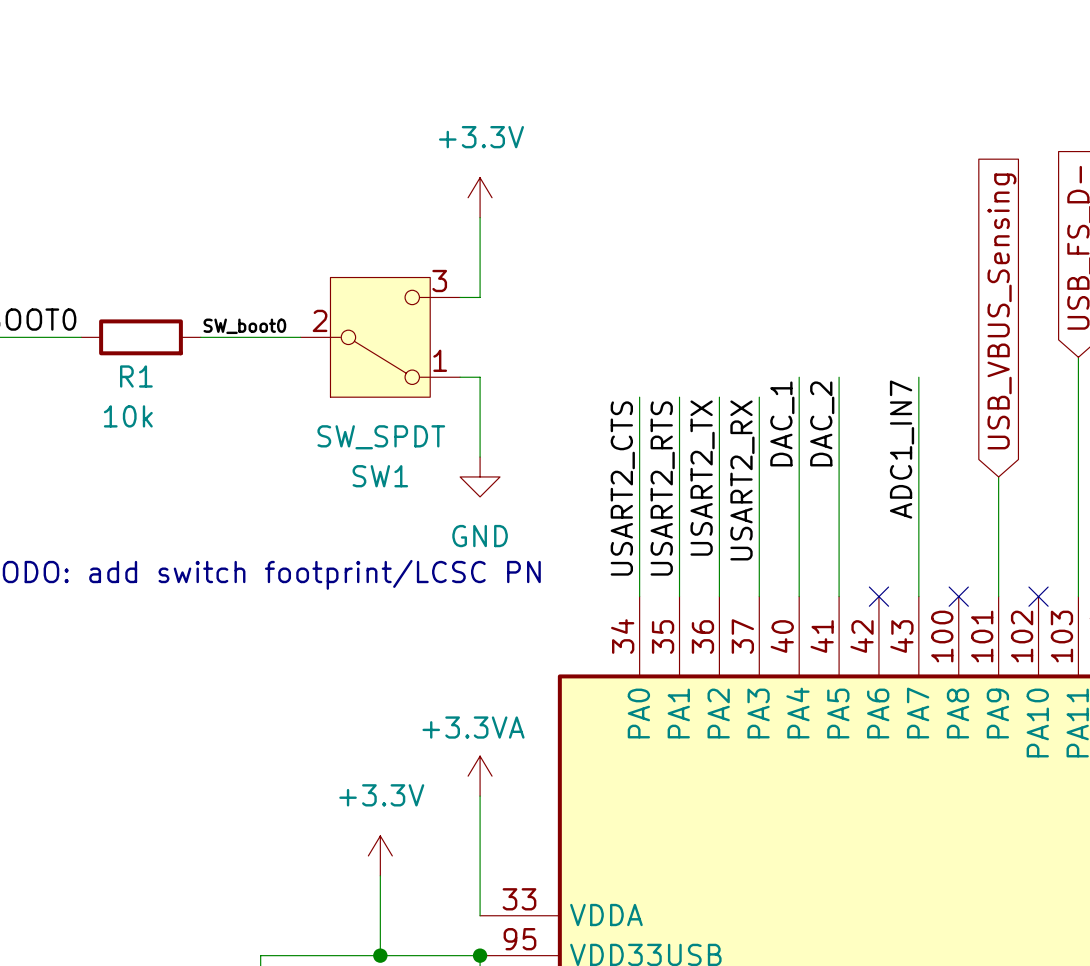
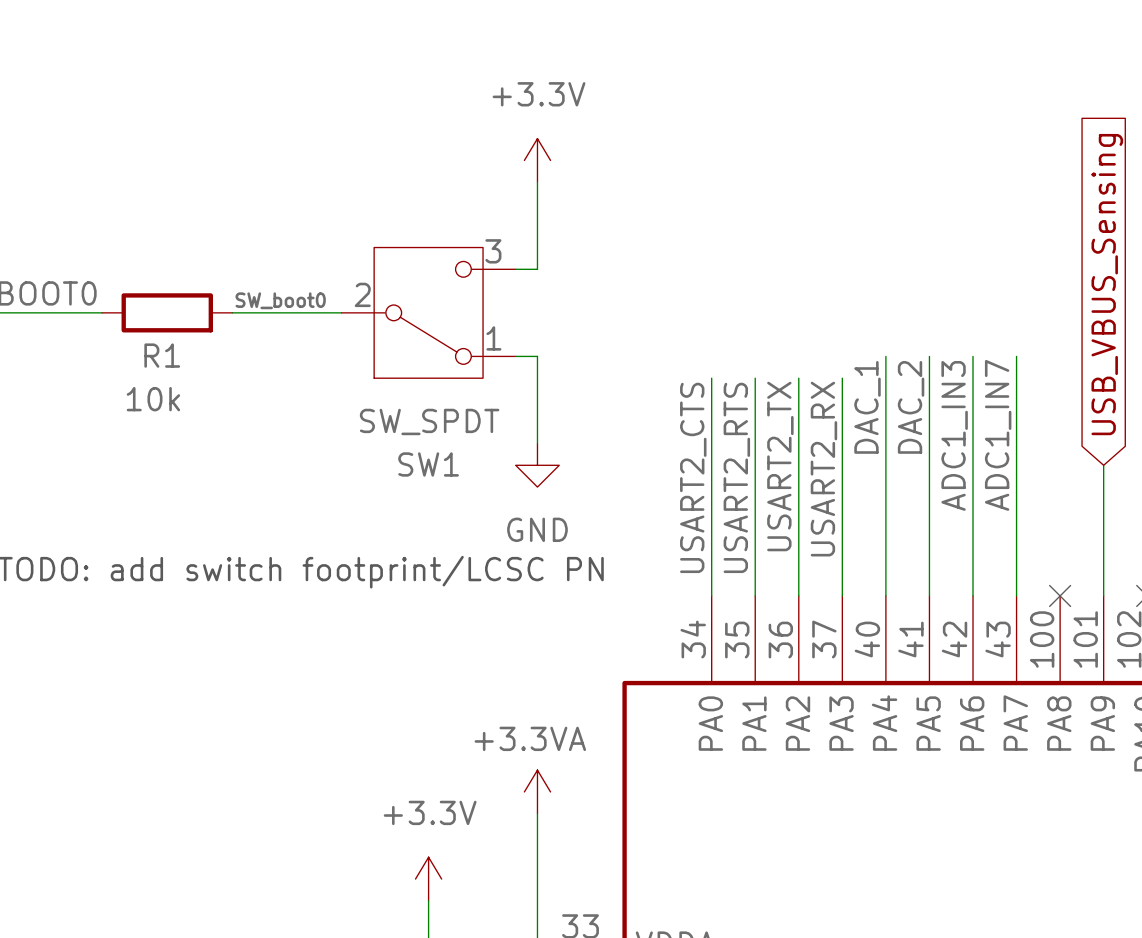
wire: none -> (973, 356) (973, 595)
label: none -> ADC1_IN3 (954, 435)
no-connect mark: (878, 596) -> none

